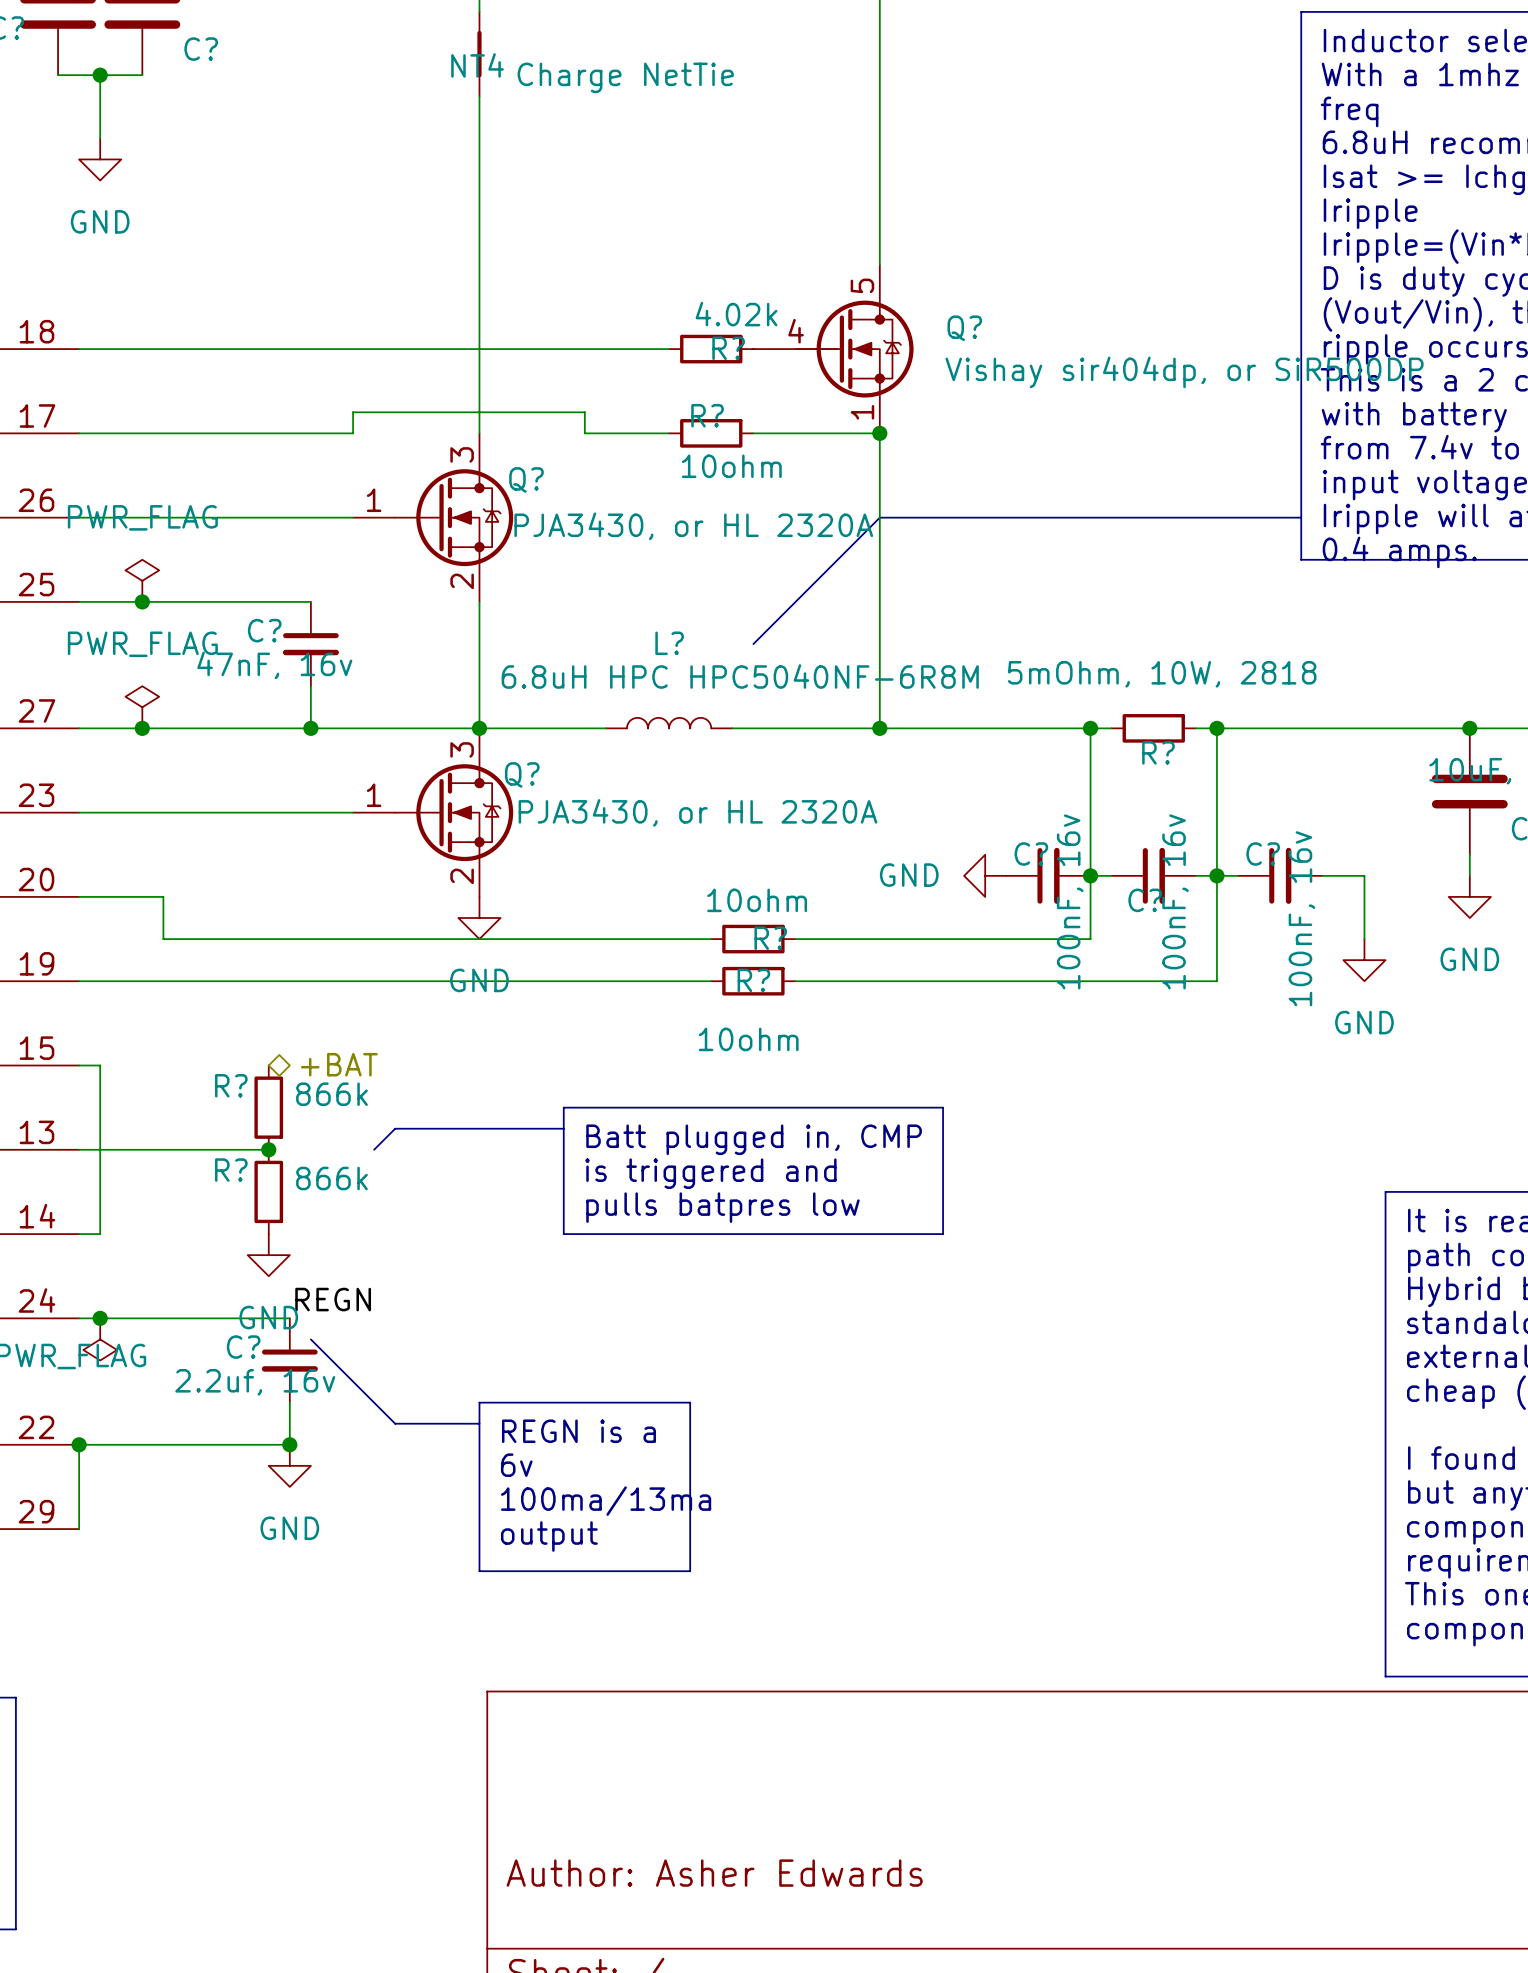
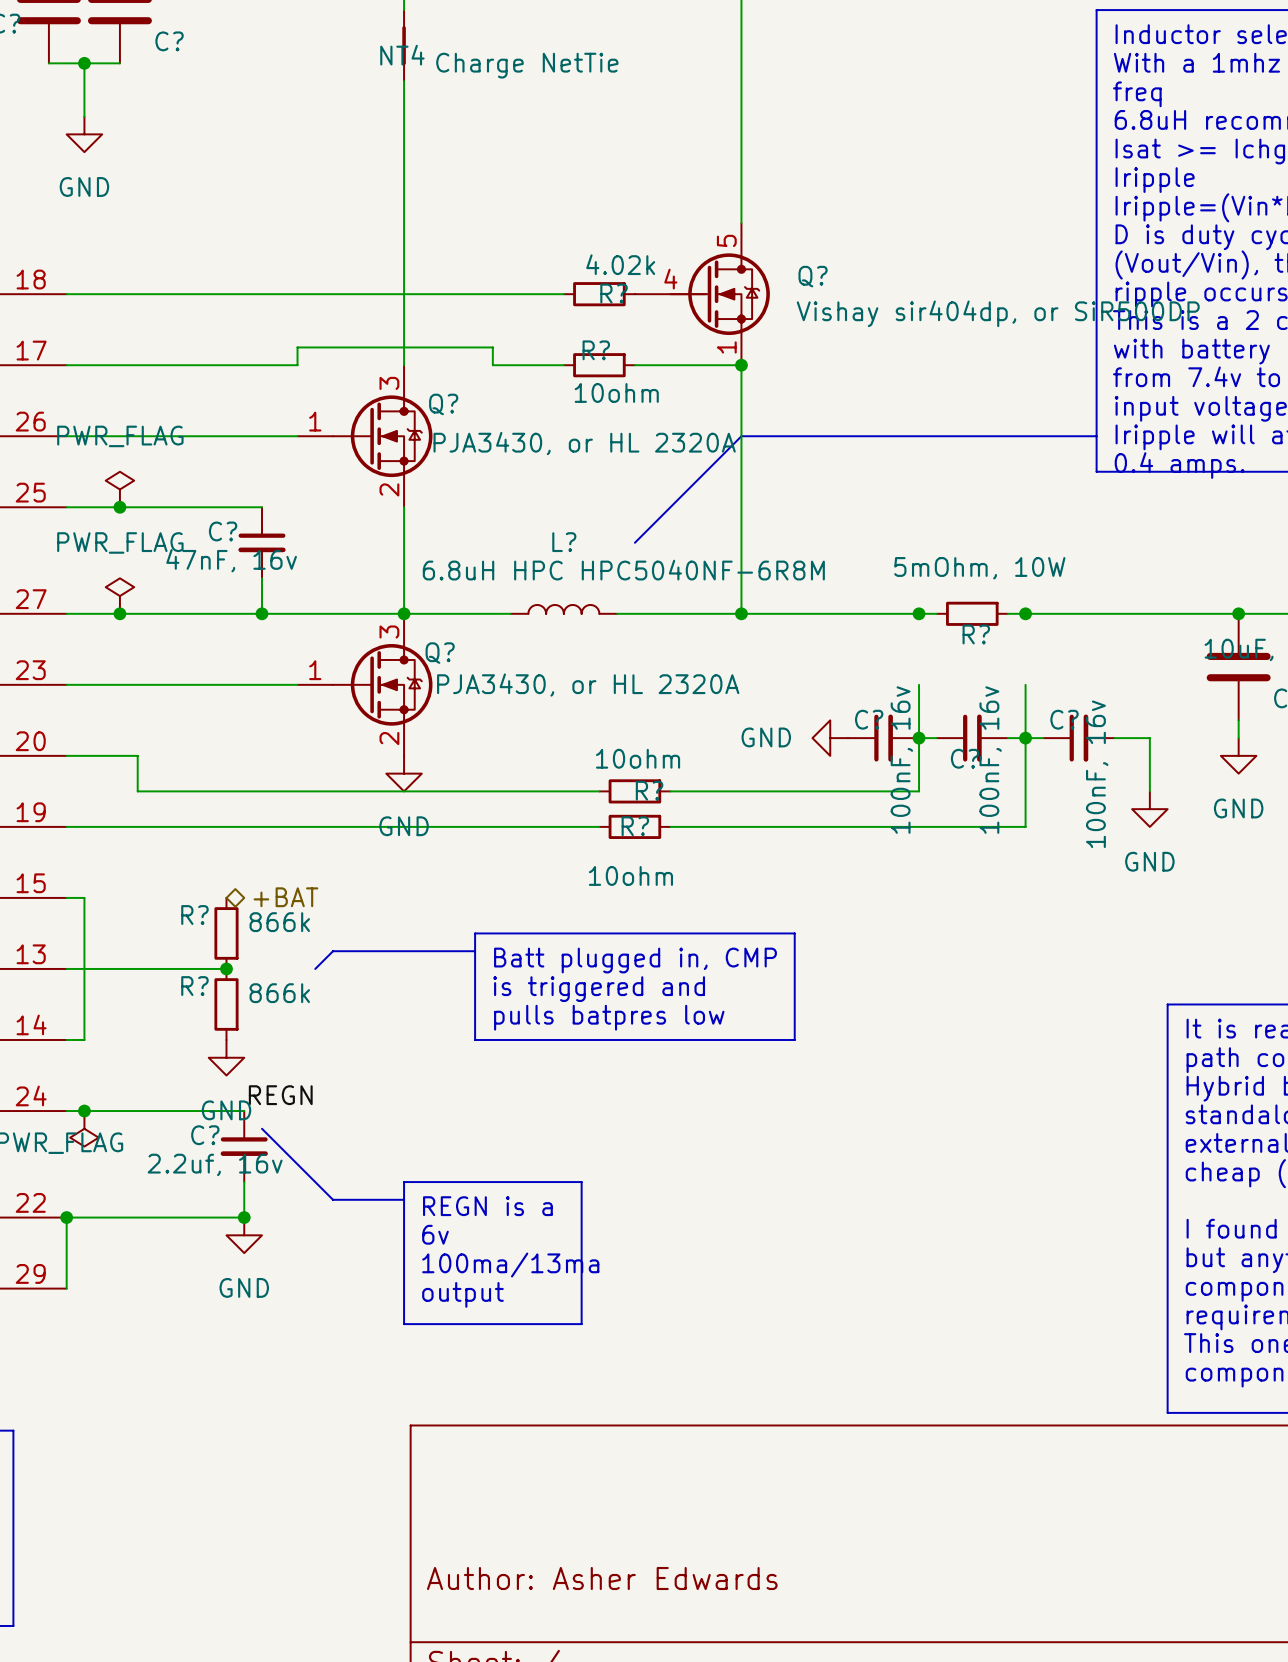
R? value: 5mOhm, 10W, 2818 (1162, 674) -> 5mOhm, 10W (979, 568)
wire: (1090, 728) (1090, 812) -> none
wire: (1216, 728) (1216, 812) -> none

